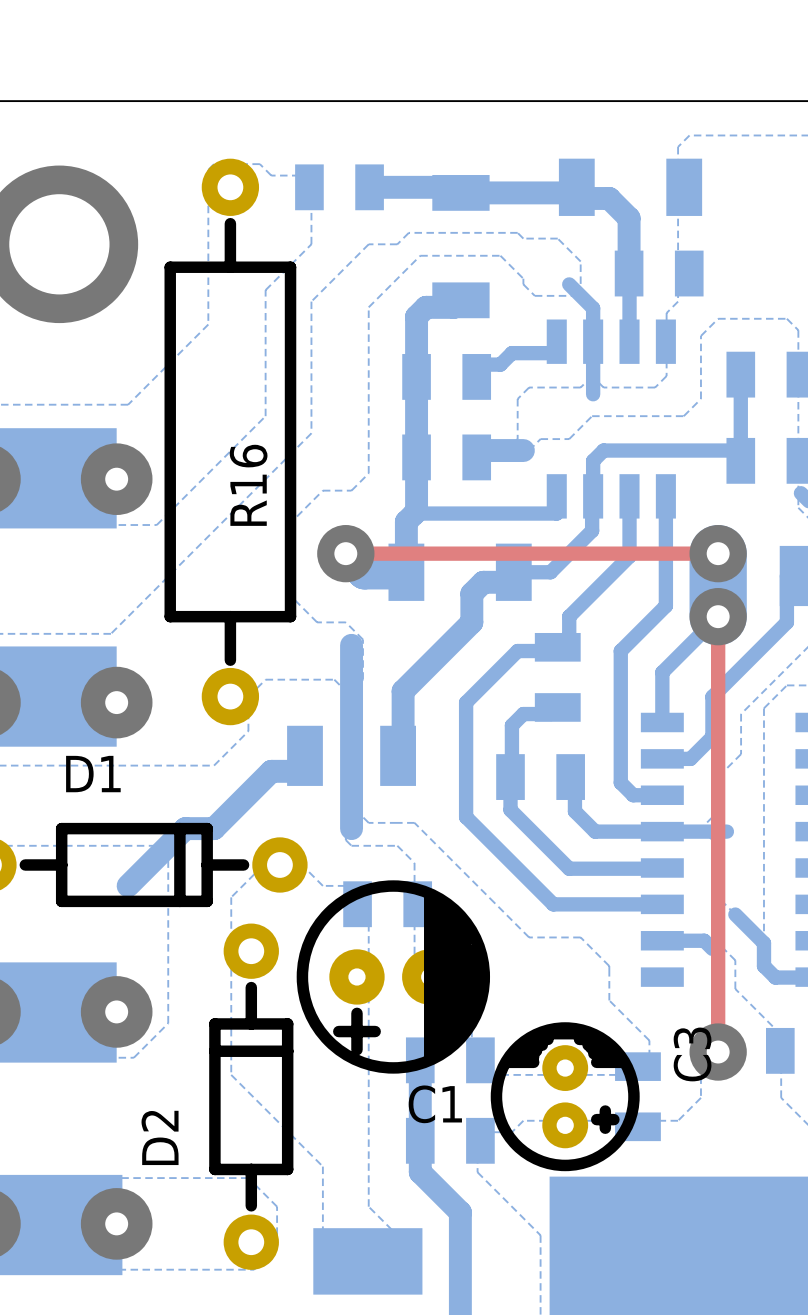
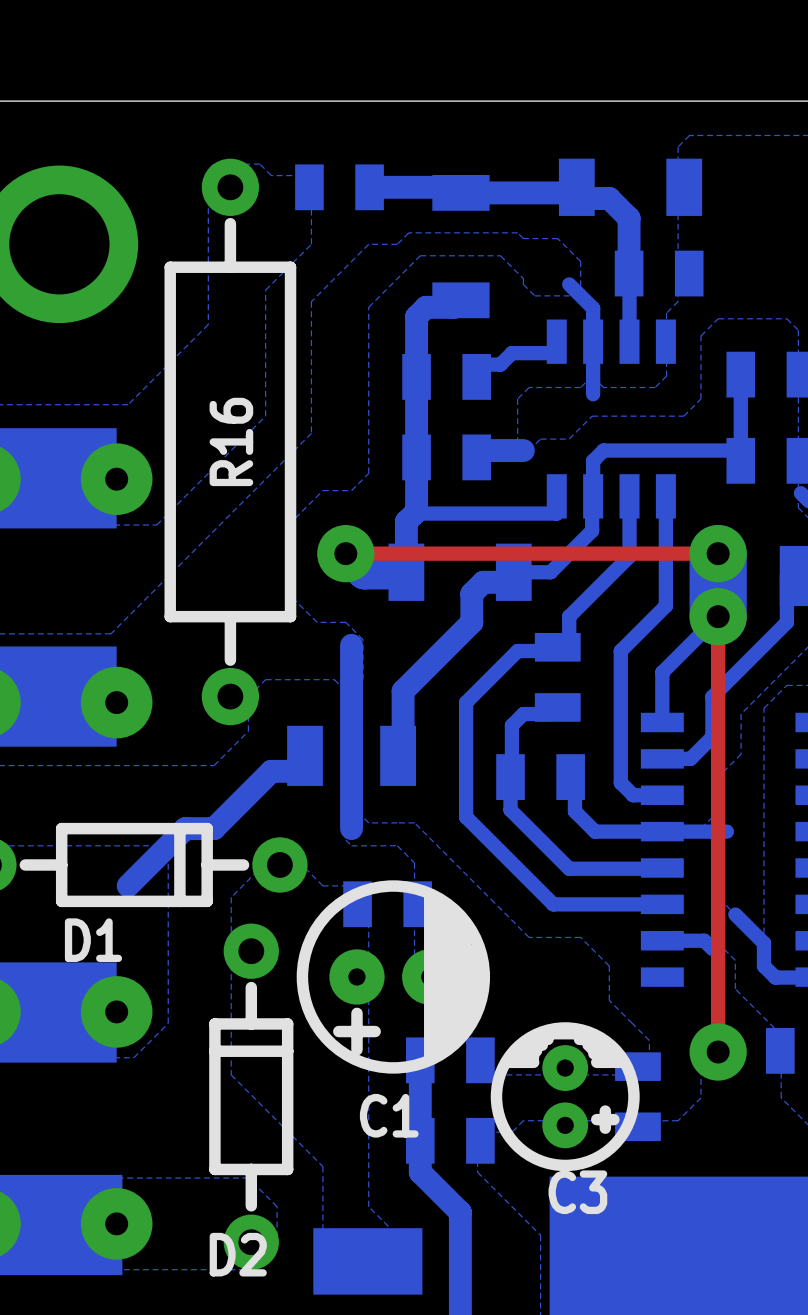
R16 name position: R16 (248, 485) -> R16 (231, 441)
D1 name position: D1 (93, 774) -> D1 (93, 940)
C3 name rotation: 0° (692, 1054) -> 90° clockwise (577, 1192)
C3 name position: C3 (692, 1054) -> C3 (577, 1192)
C1 name position: C1 (435, 1104) -> C1 (389, 1115)
D2 name rotation: 0° (160, 1137) -> 90° clockwise (238, 1254)
D2 name position: D2 (160, 1137) -> D2 (238, 1254)

